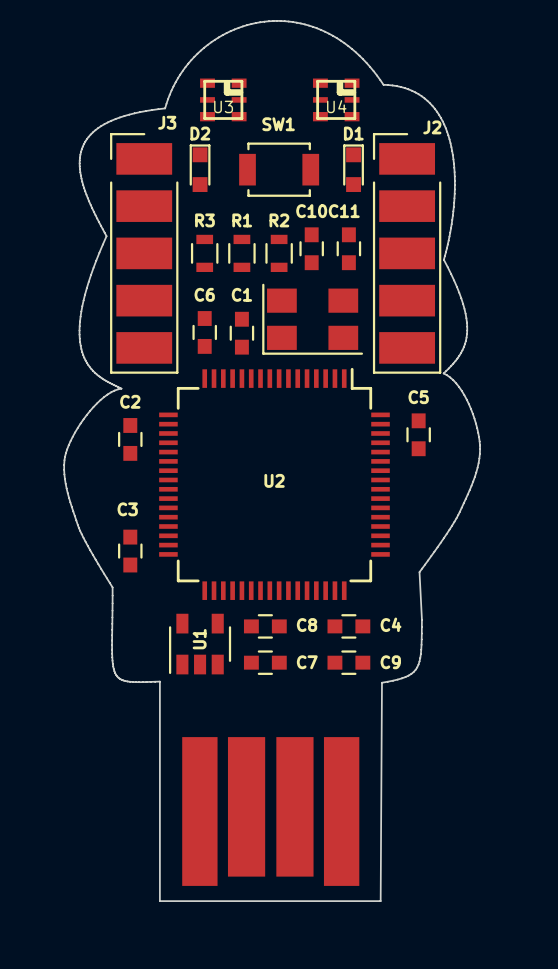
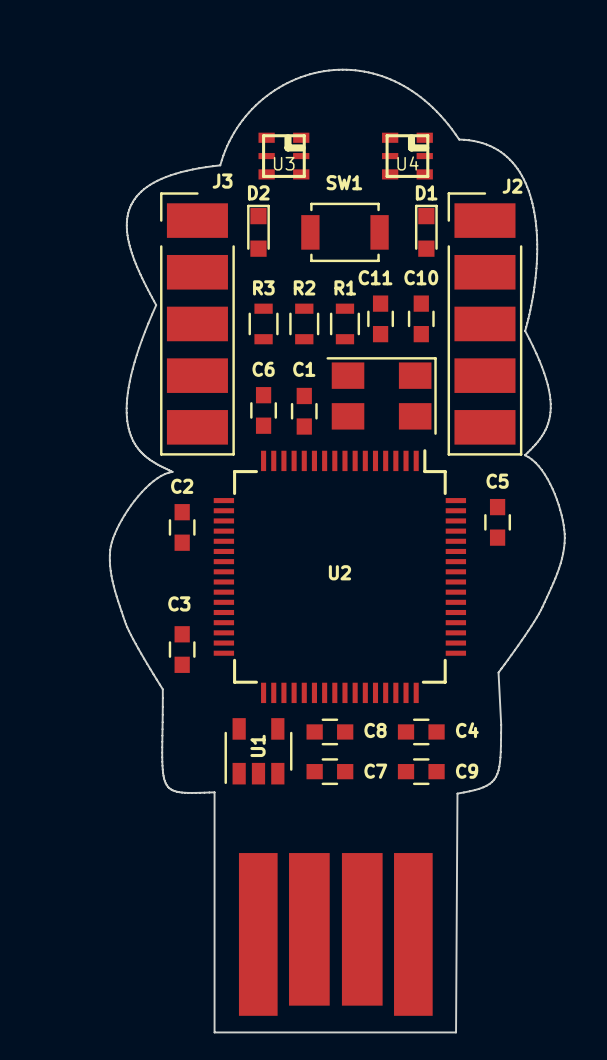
C10 name: C10 (311, 211) -> C11 (375, 277)
C11 name: C11 (344, 211) -> C10 (421, 277)
R1 name: R1 (242, 220) -> R2 (304, 287)
R2 name: R2 (279, 220) -> R1 (345, 287)
part rotation: 0° (312, 319) -> 180° (381, 395)

